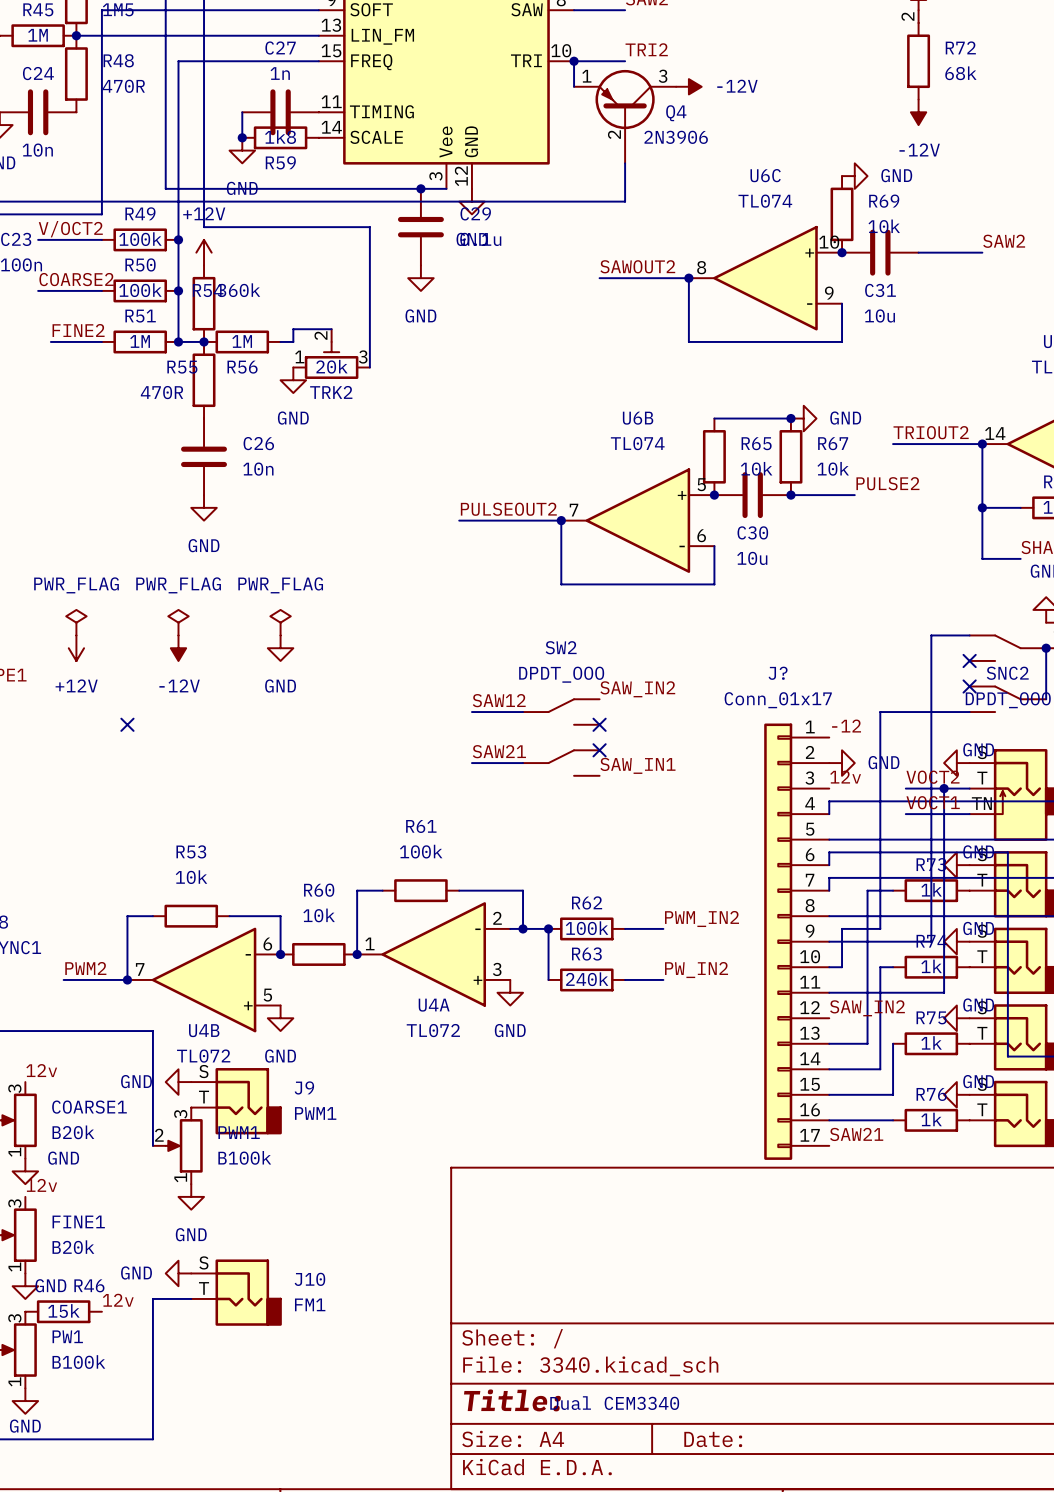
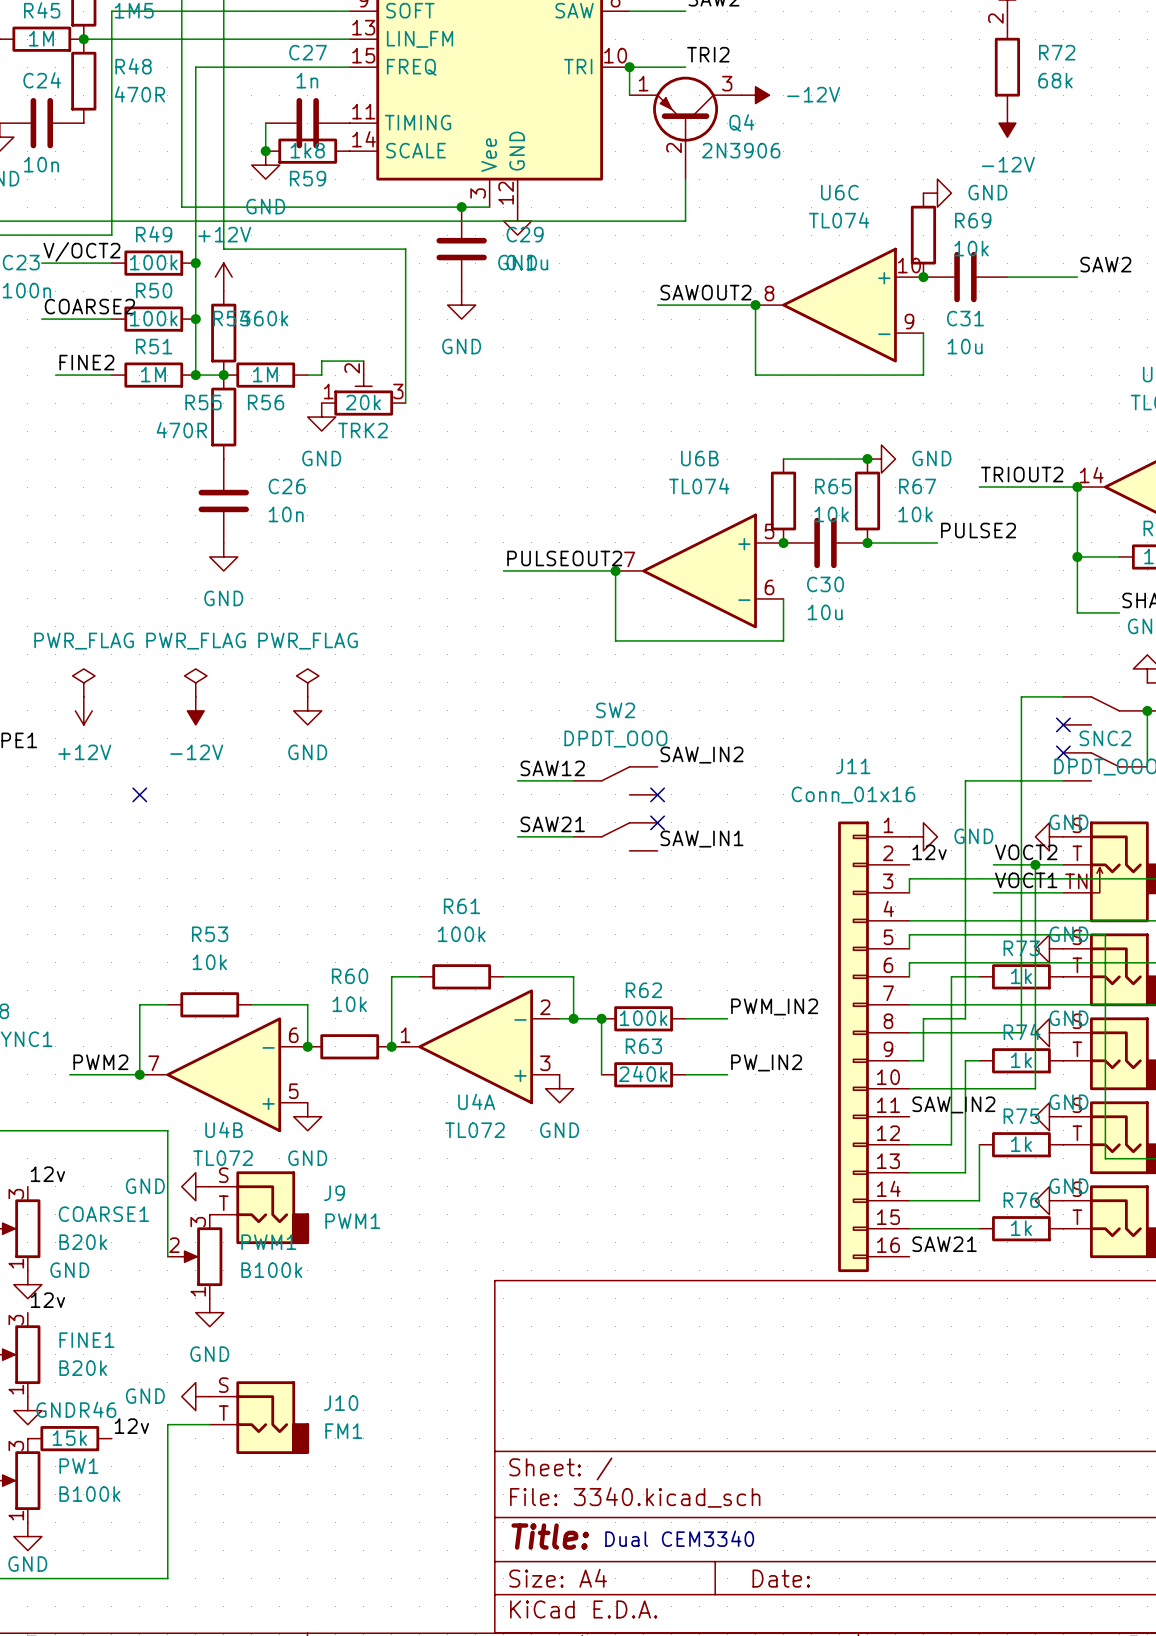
label: -12 (846, 726) -> none
J?: Conn_01x17 (796, 941) -> none
J11: none -> Conn_01x16 (873, 1046)

